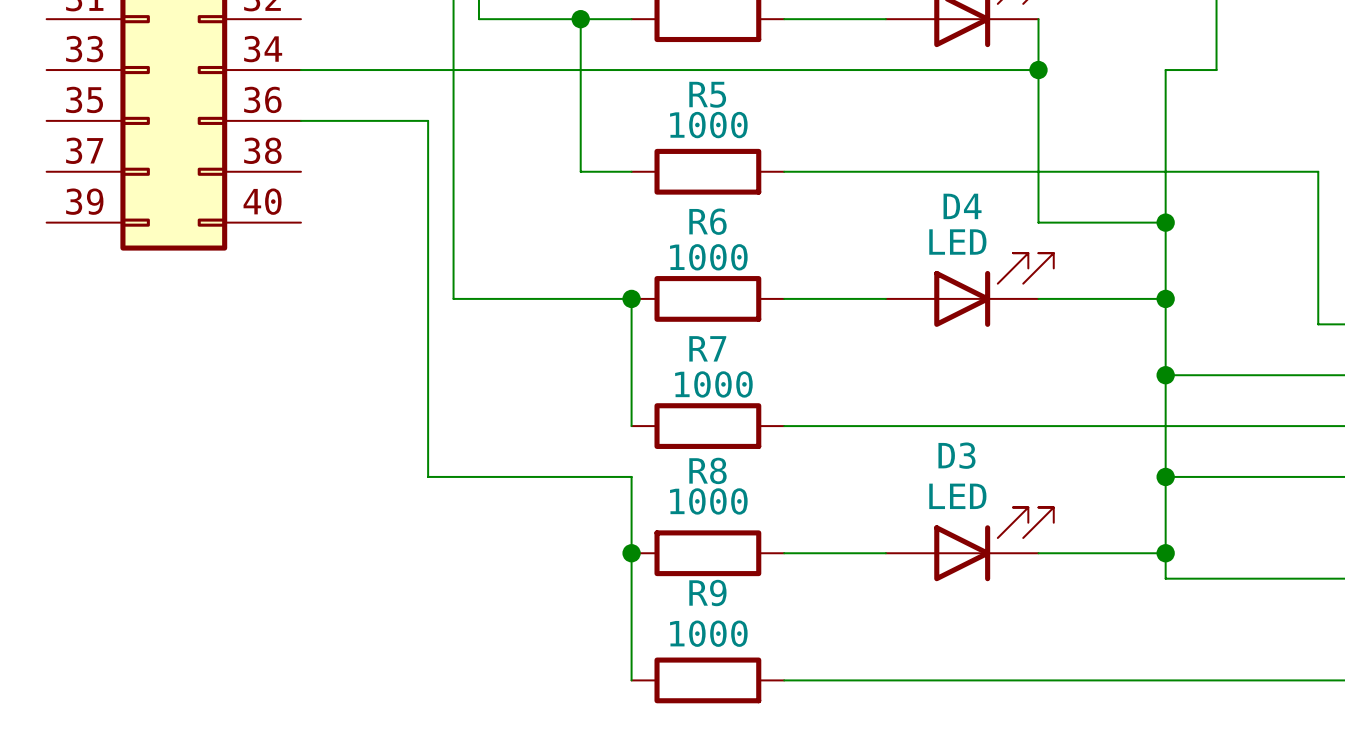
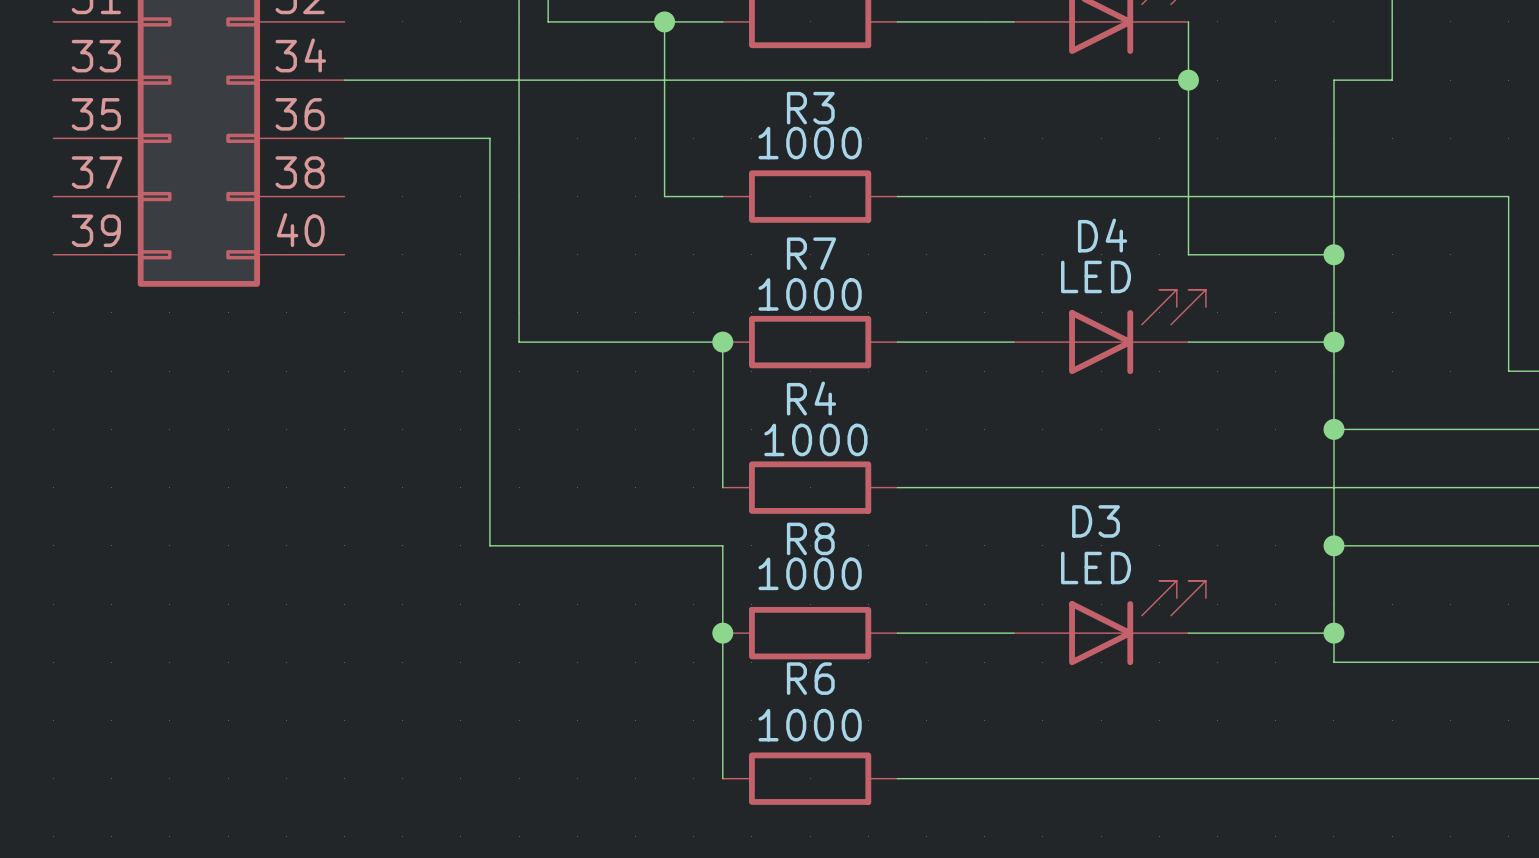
R5 name: R5 (707, 94) -> R3 (810, 108)
R6 name: R6 (707, 221) -> R7 (811, 253)
R7 name: R7 (707, 348) -> R4 (811, 398)
R9 name: R9 (707, 593) -> R6 (810, 678)

